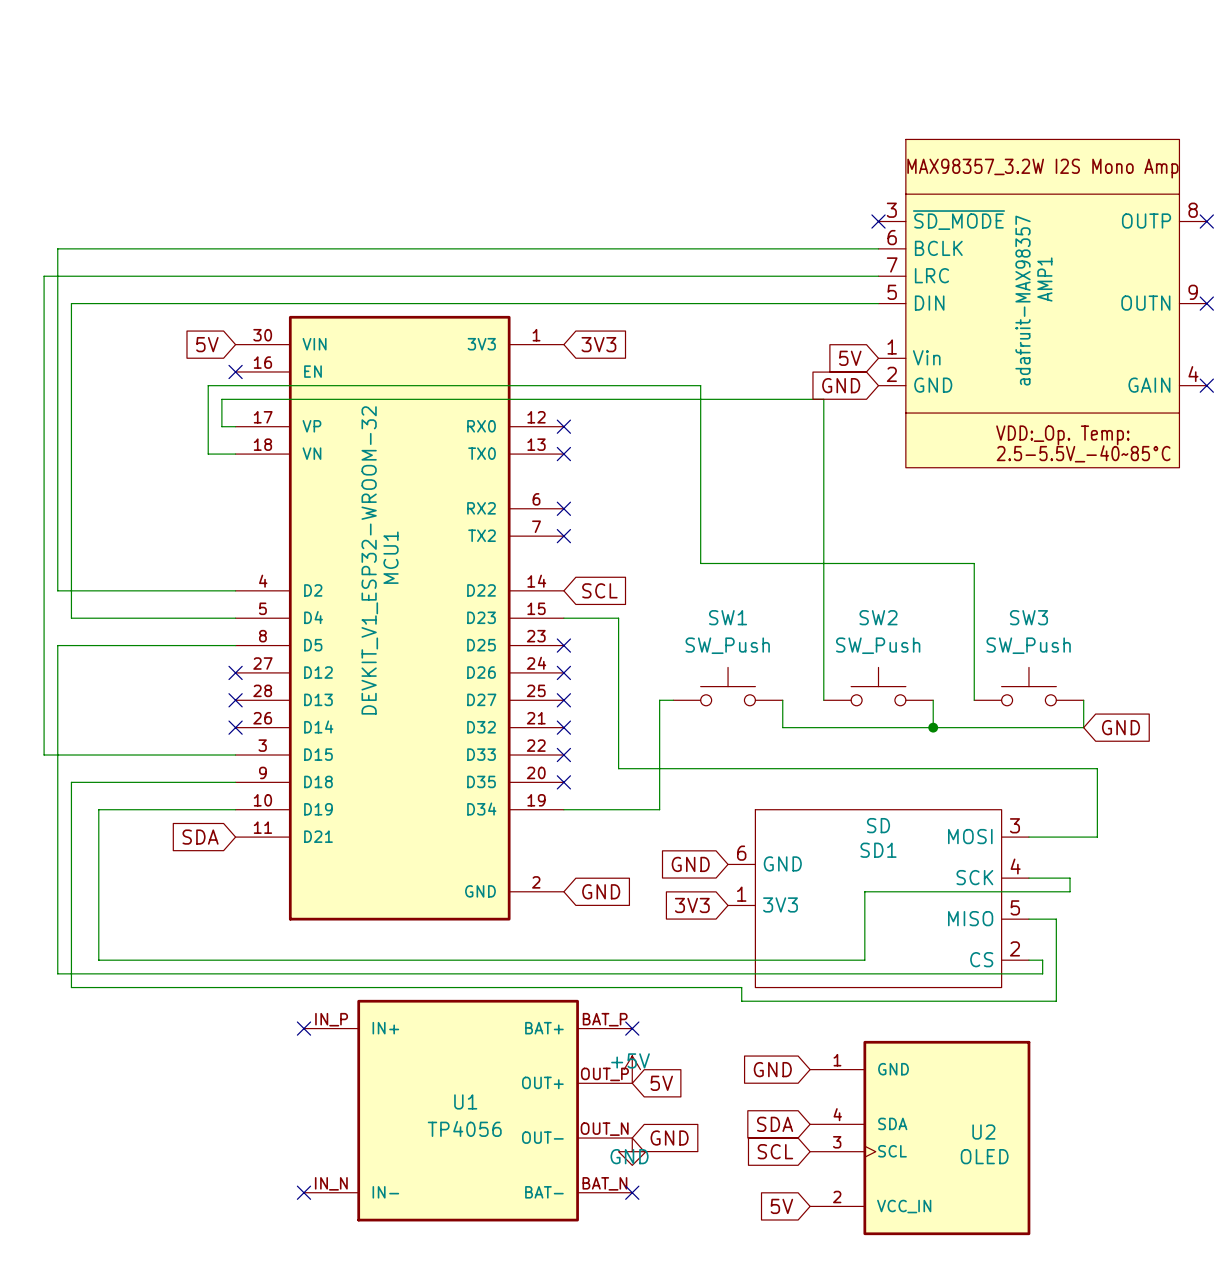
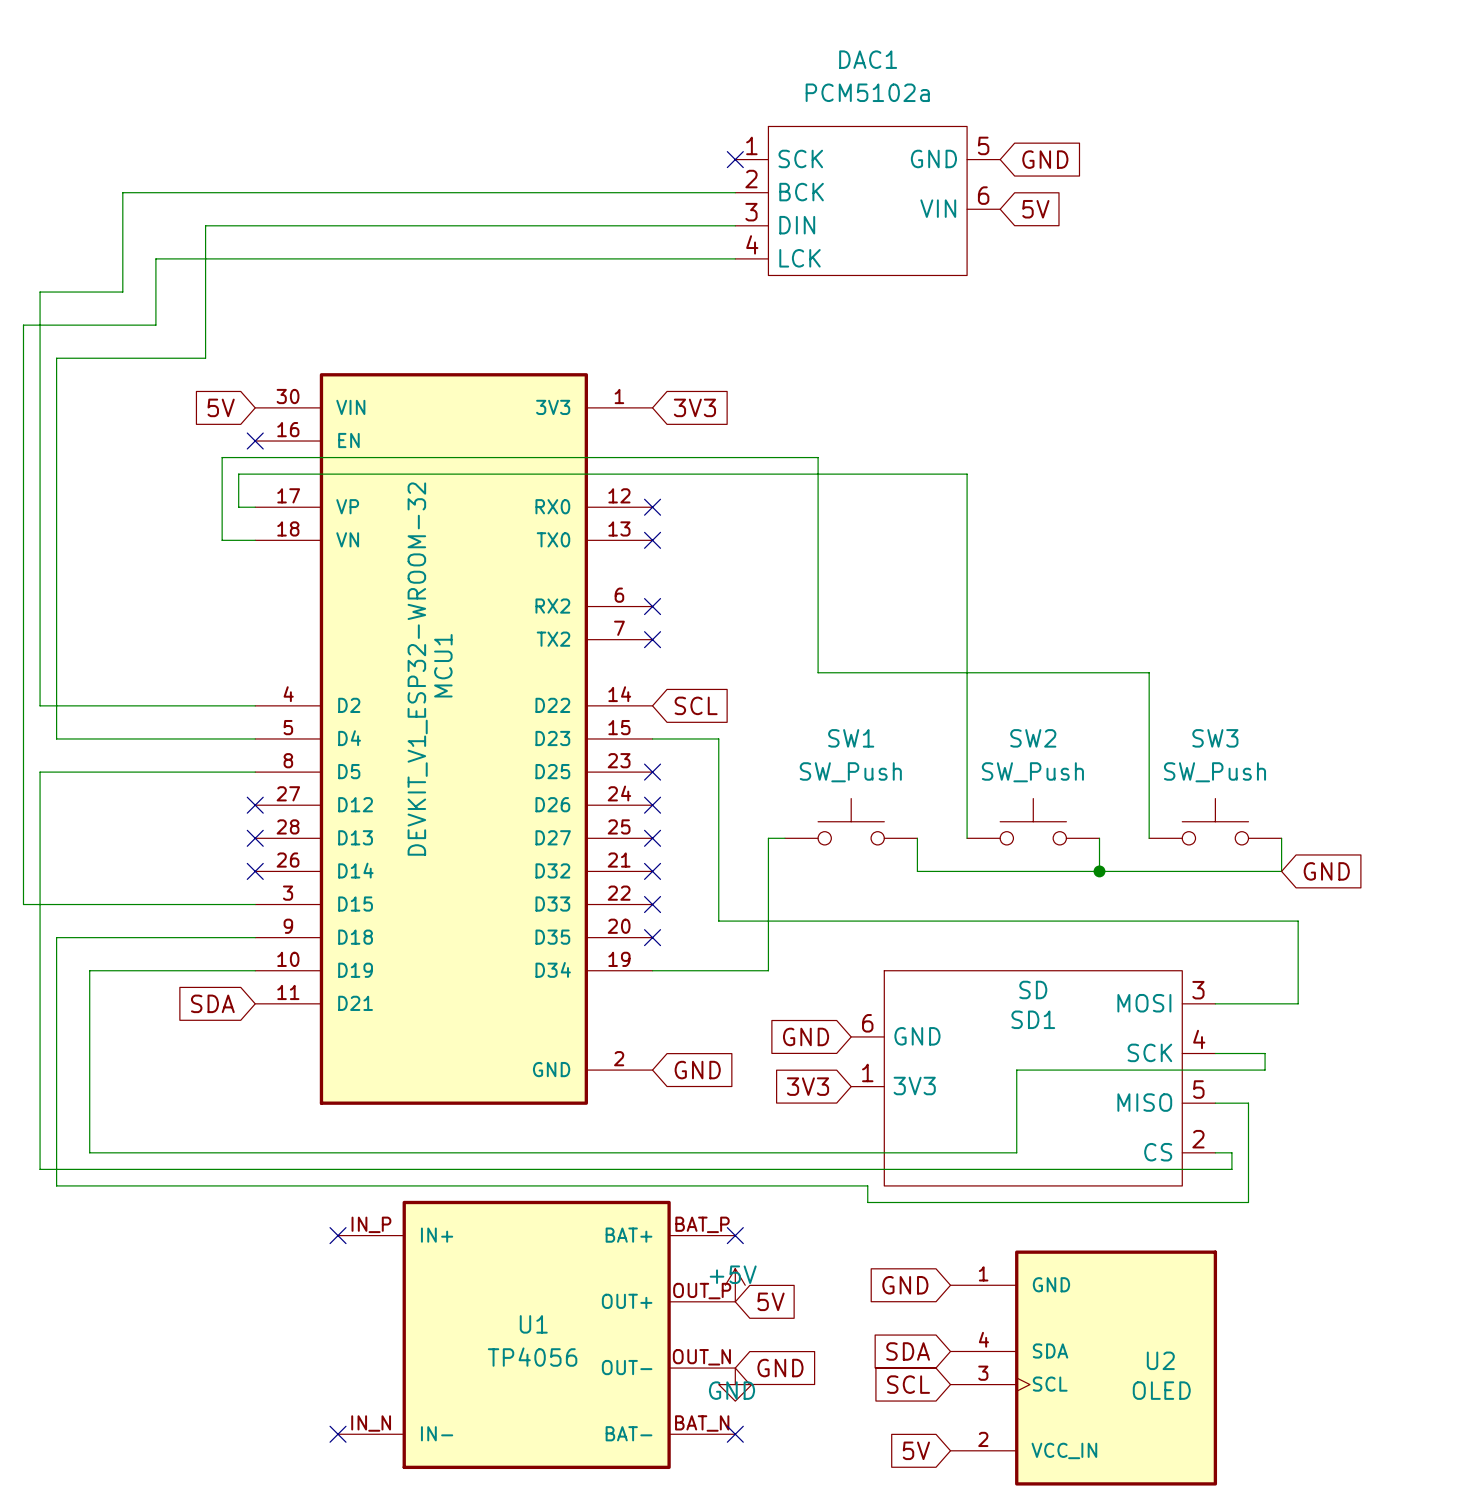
no-connect mark: none -> (735, 159)
DAC1: none -> PCM5102a (867, 200)
no-connect mark: (878, 221) -> none
no-connect mark: (1206, 221) -> none
wire: (126, 248) (878, 248) -> (122, 292) (122, 192) (735, 192)
wire: (153, 276) (878, 276) -> (155, 325) (155, 258) (735, 258)
wire: (194, 303) (878, 303) -> (205, 358) (205, 225) (735, 225)
AMP1: adafruit-MAX98357 (1042, 303) -> none
no-connect mark: (1206, 303) -> none
global label rotation: 0° (850, 358) -> 180° (1035, 209)
global label position: 5V (850, 358) -> 5V (1035, 209)
global label rotation: 0° (841, 385) -> 180° (1045, 159)
global label position: GND (841, 385) -> GND (1045, 159)
no-connect mark: (1206, 385) -> none

